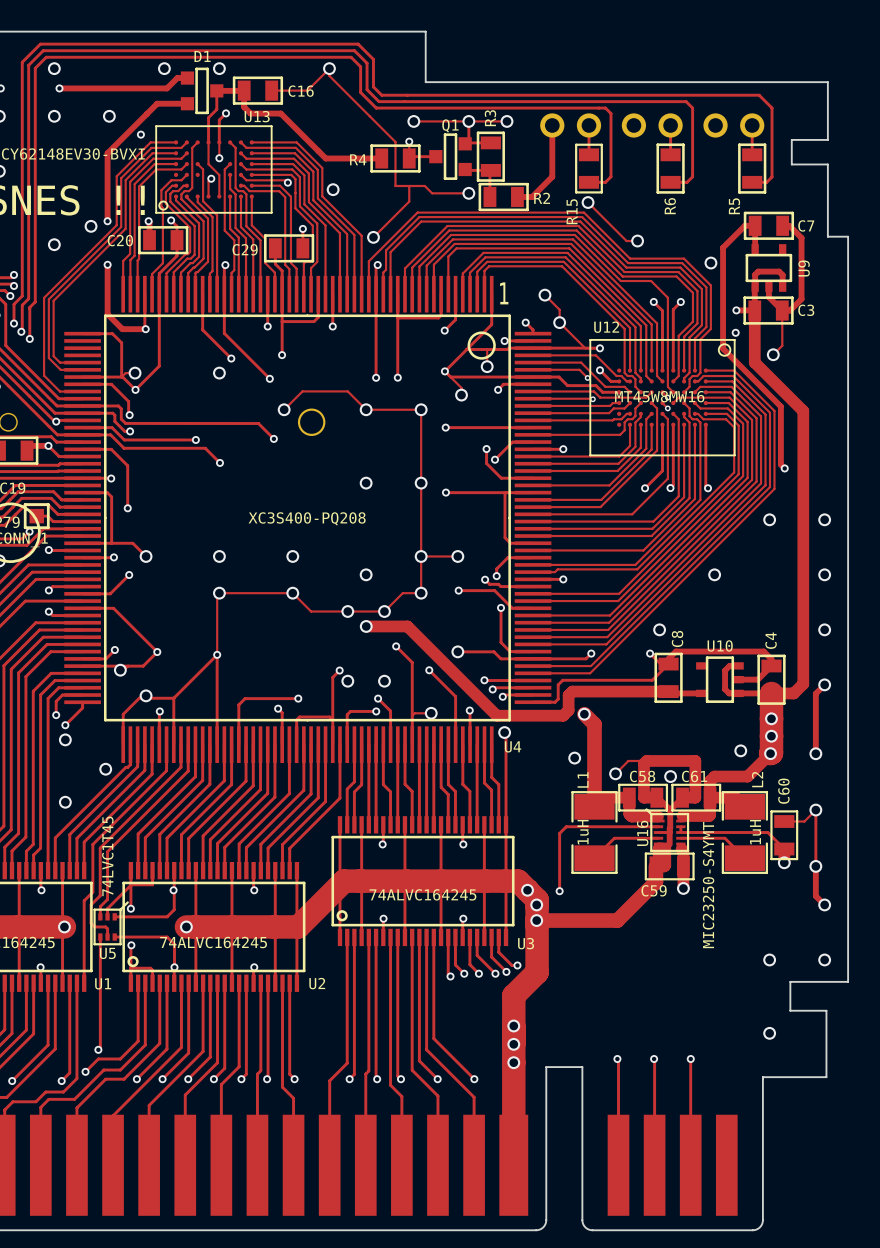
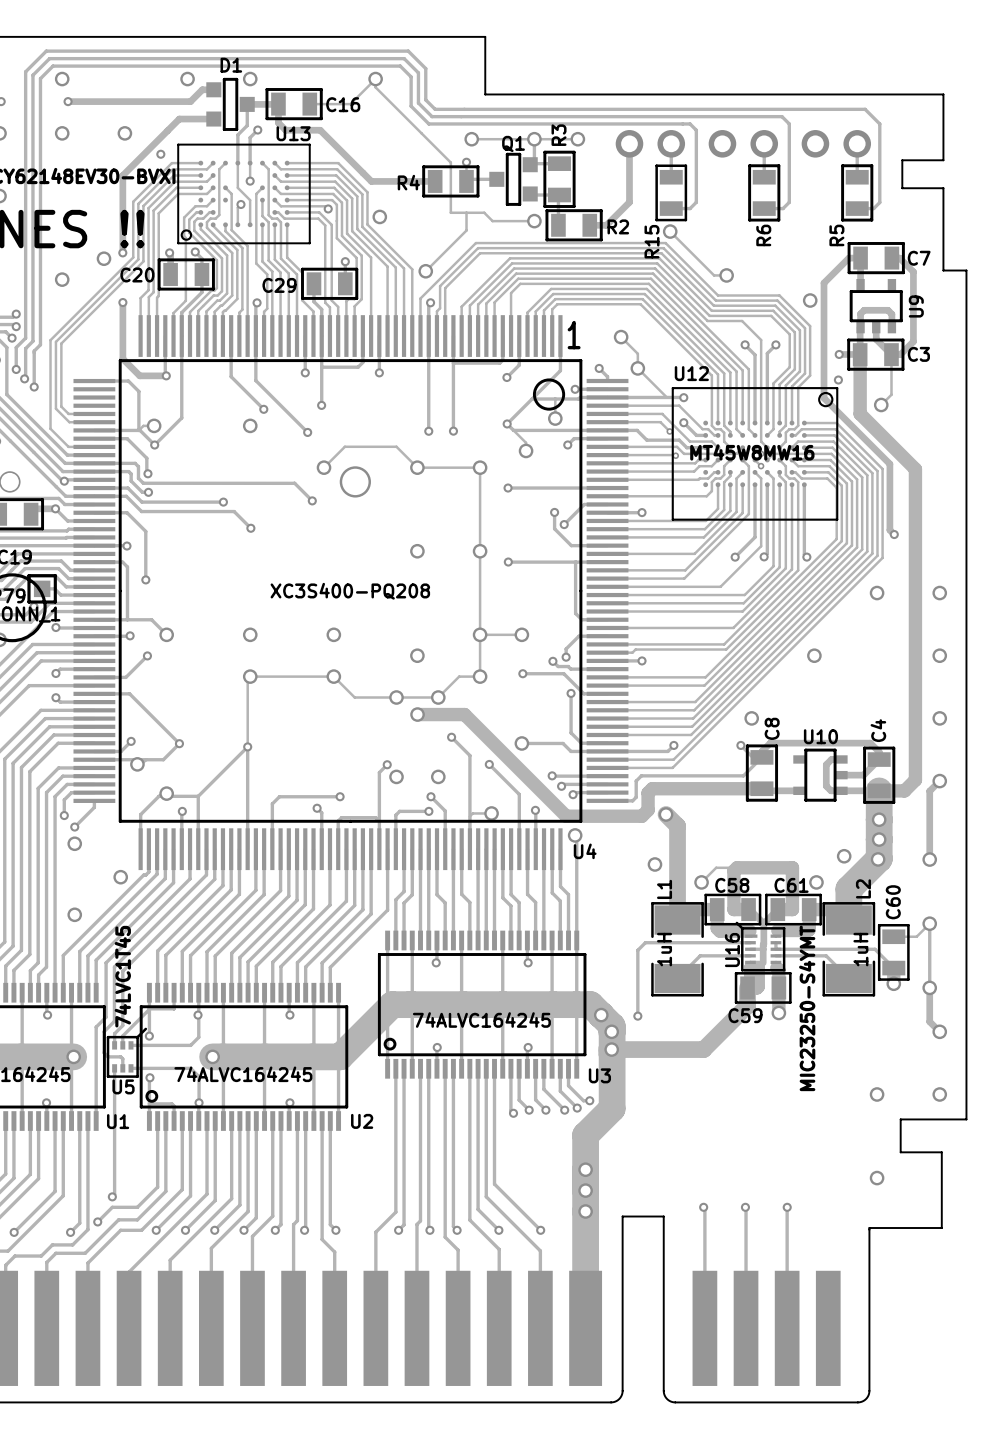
track: (770, 753) (747, 776) (714, 776) (710, 781) (710, 797) -> none
track: none -> (879, 858) (848, 889) (848, 920)
via position: (670, 776) -> (816, 882)

